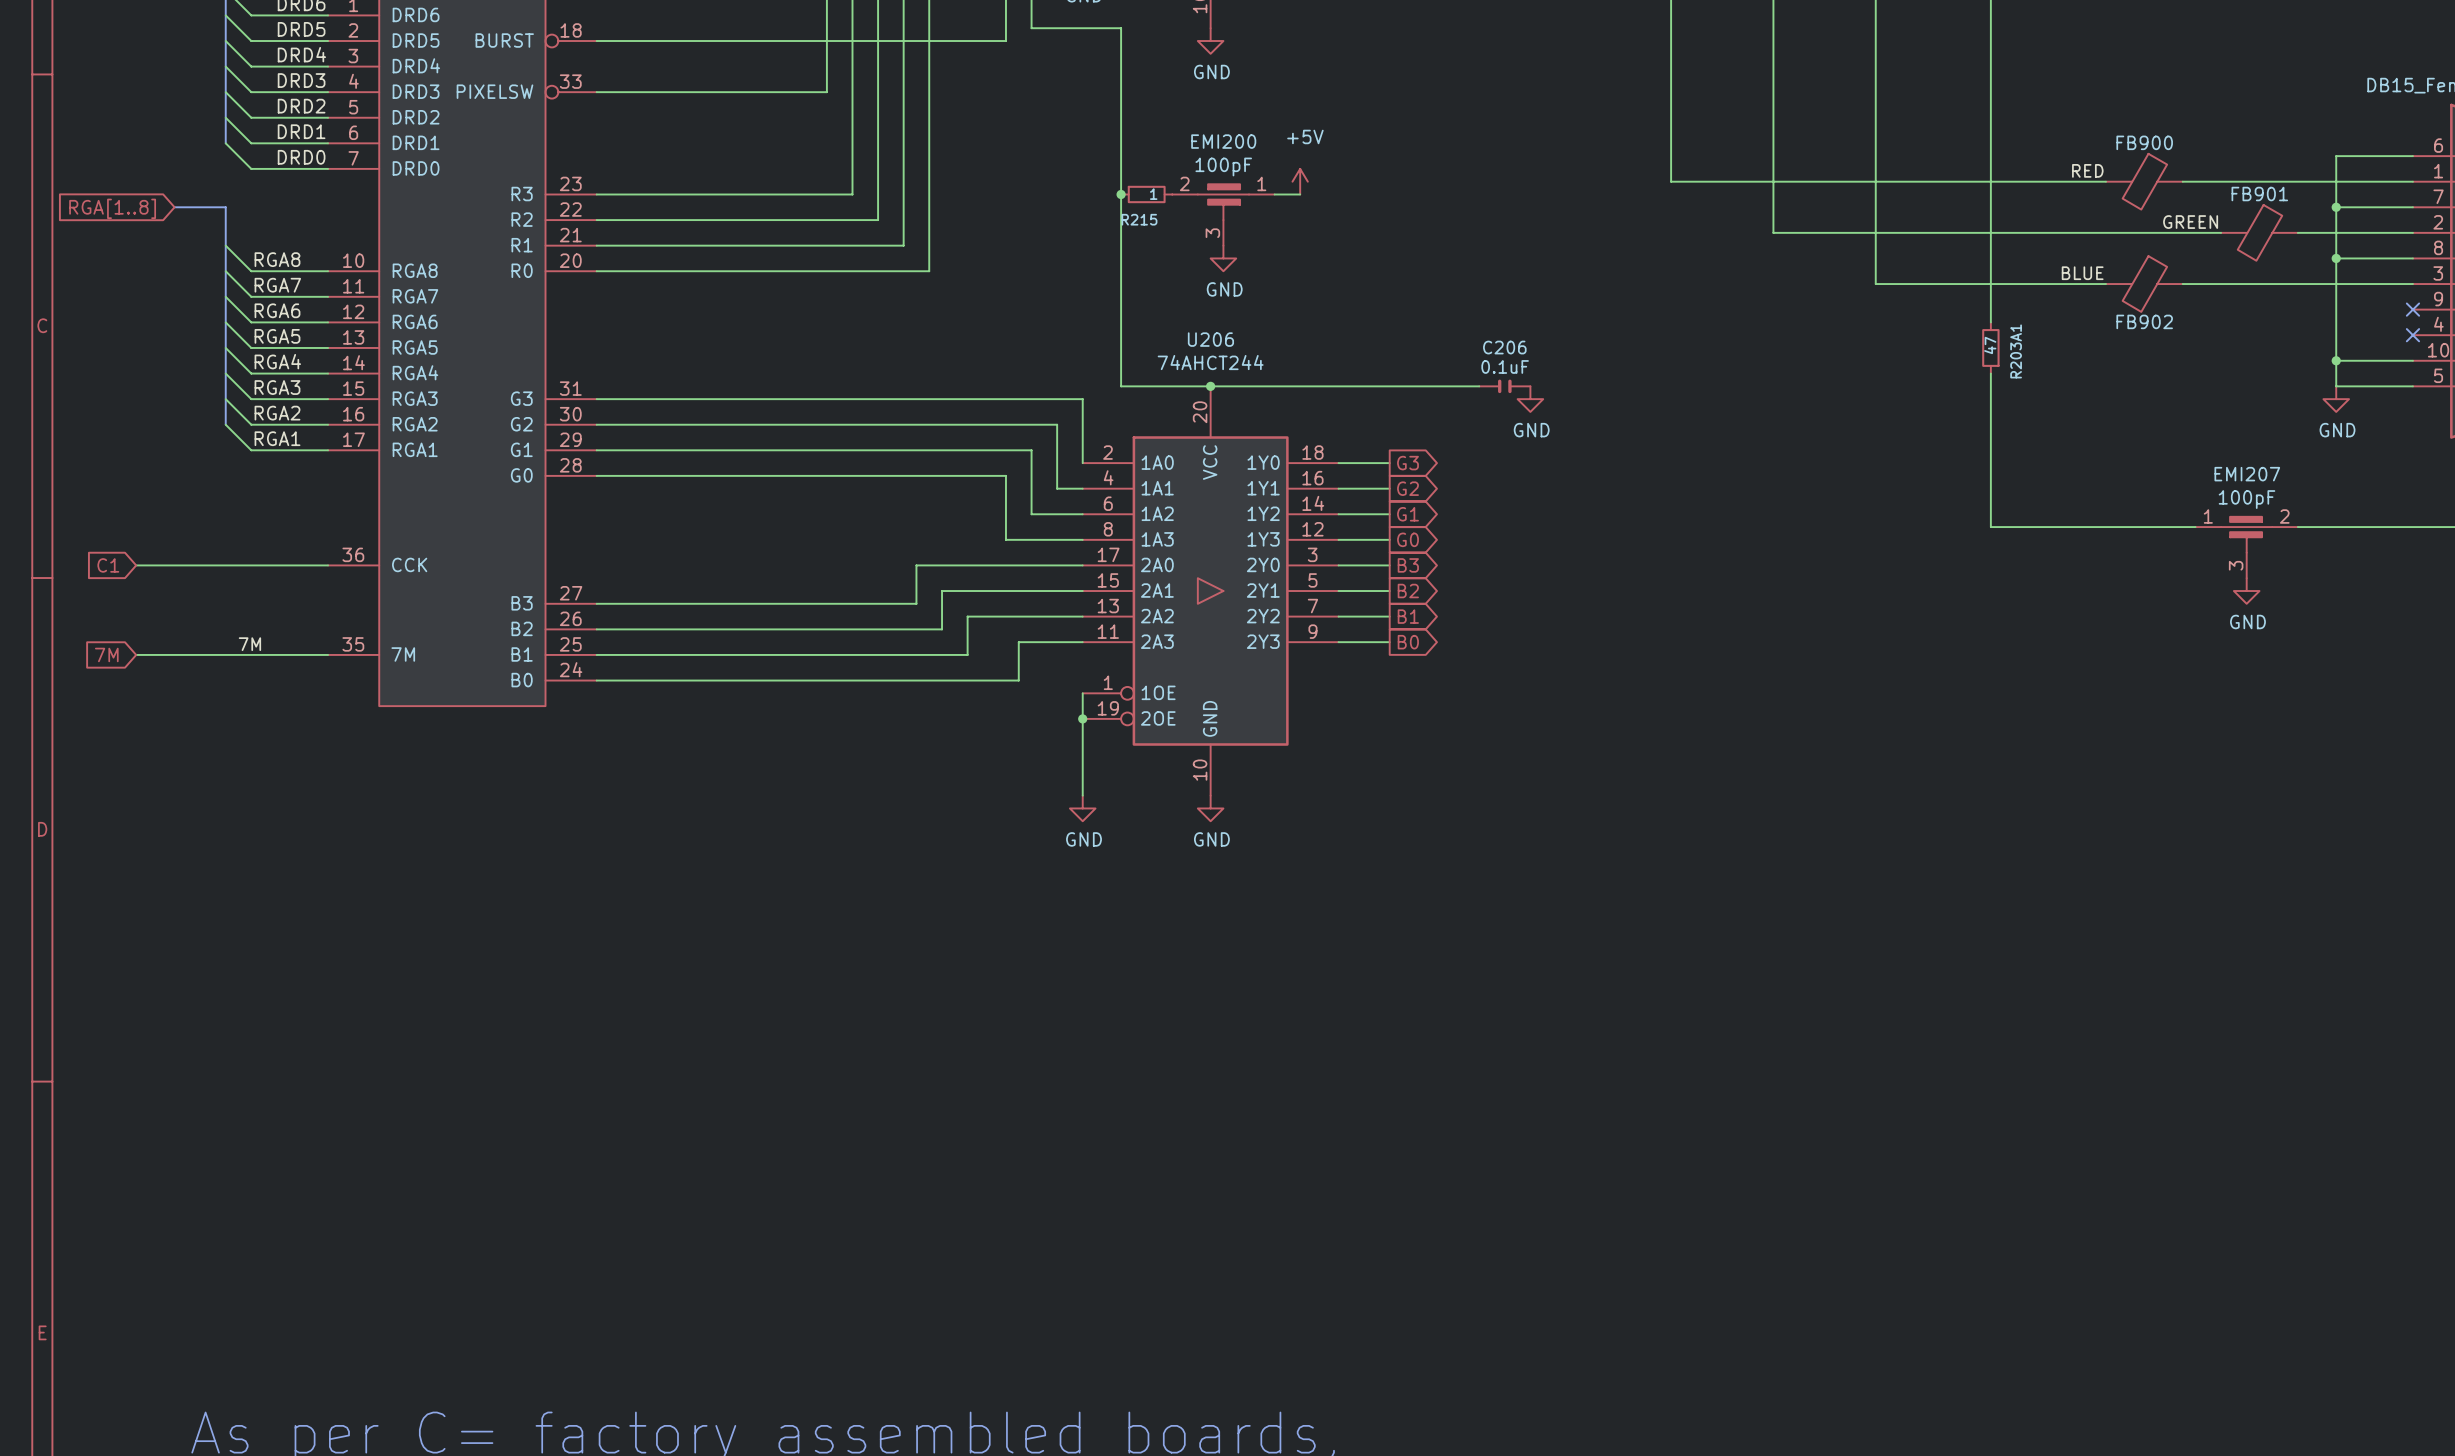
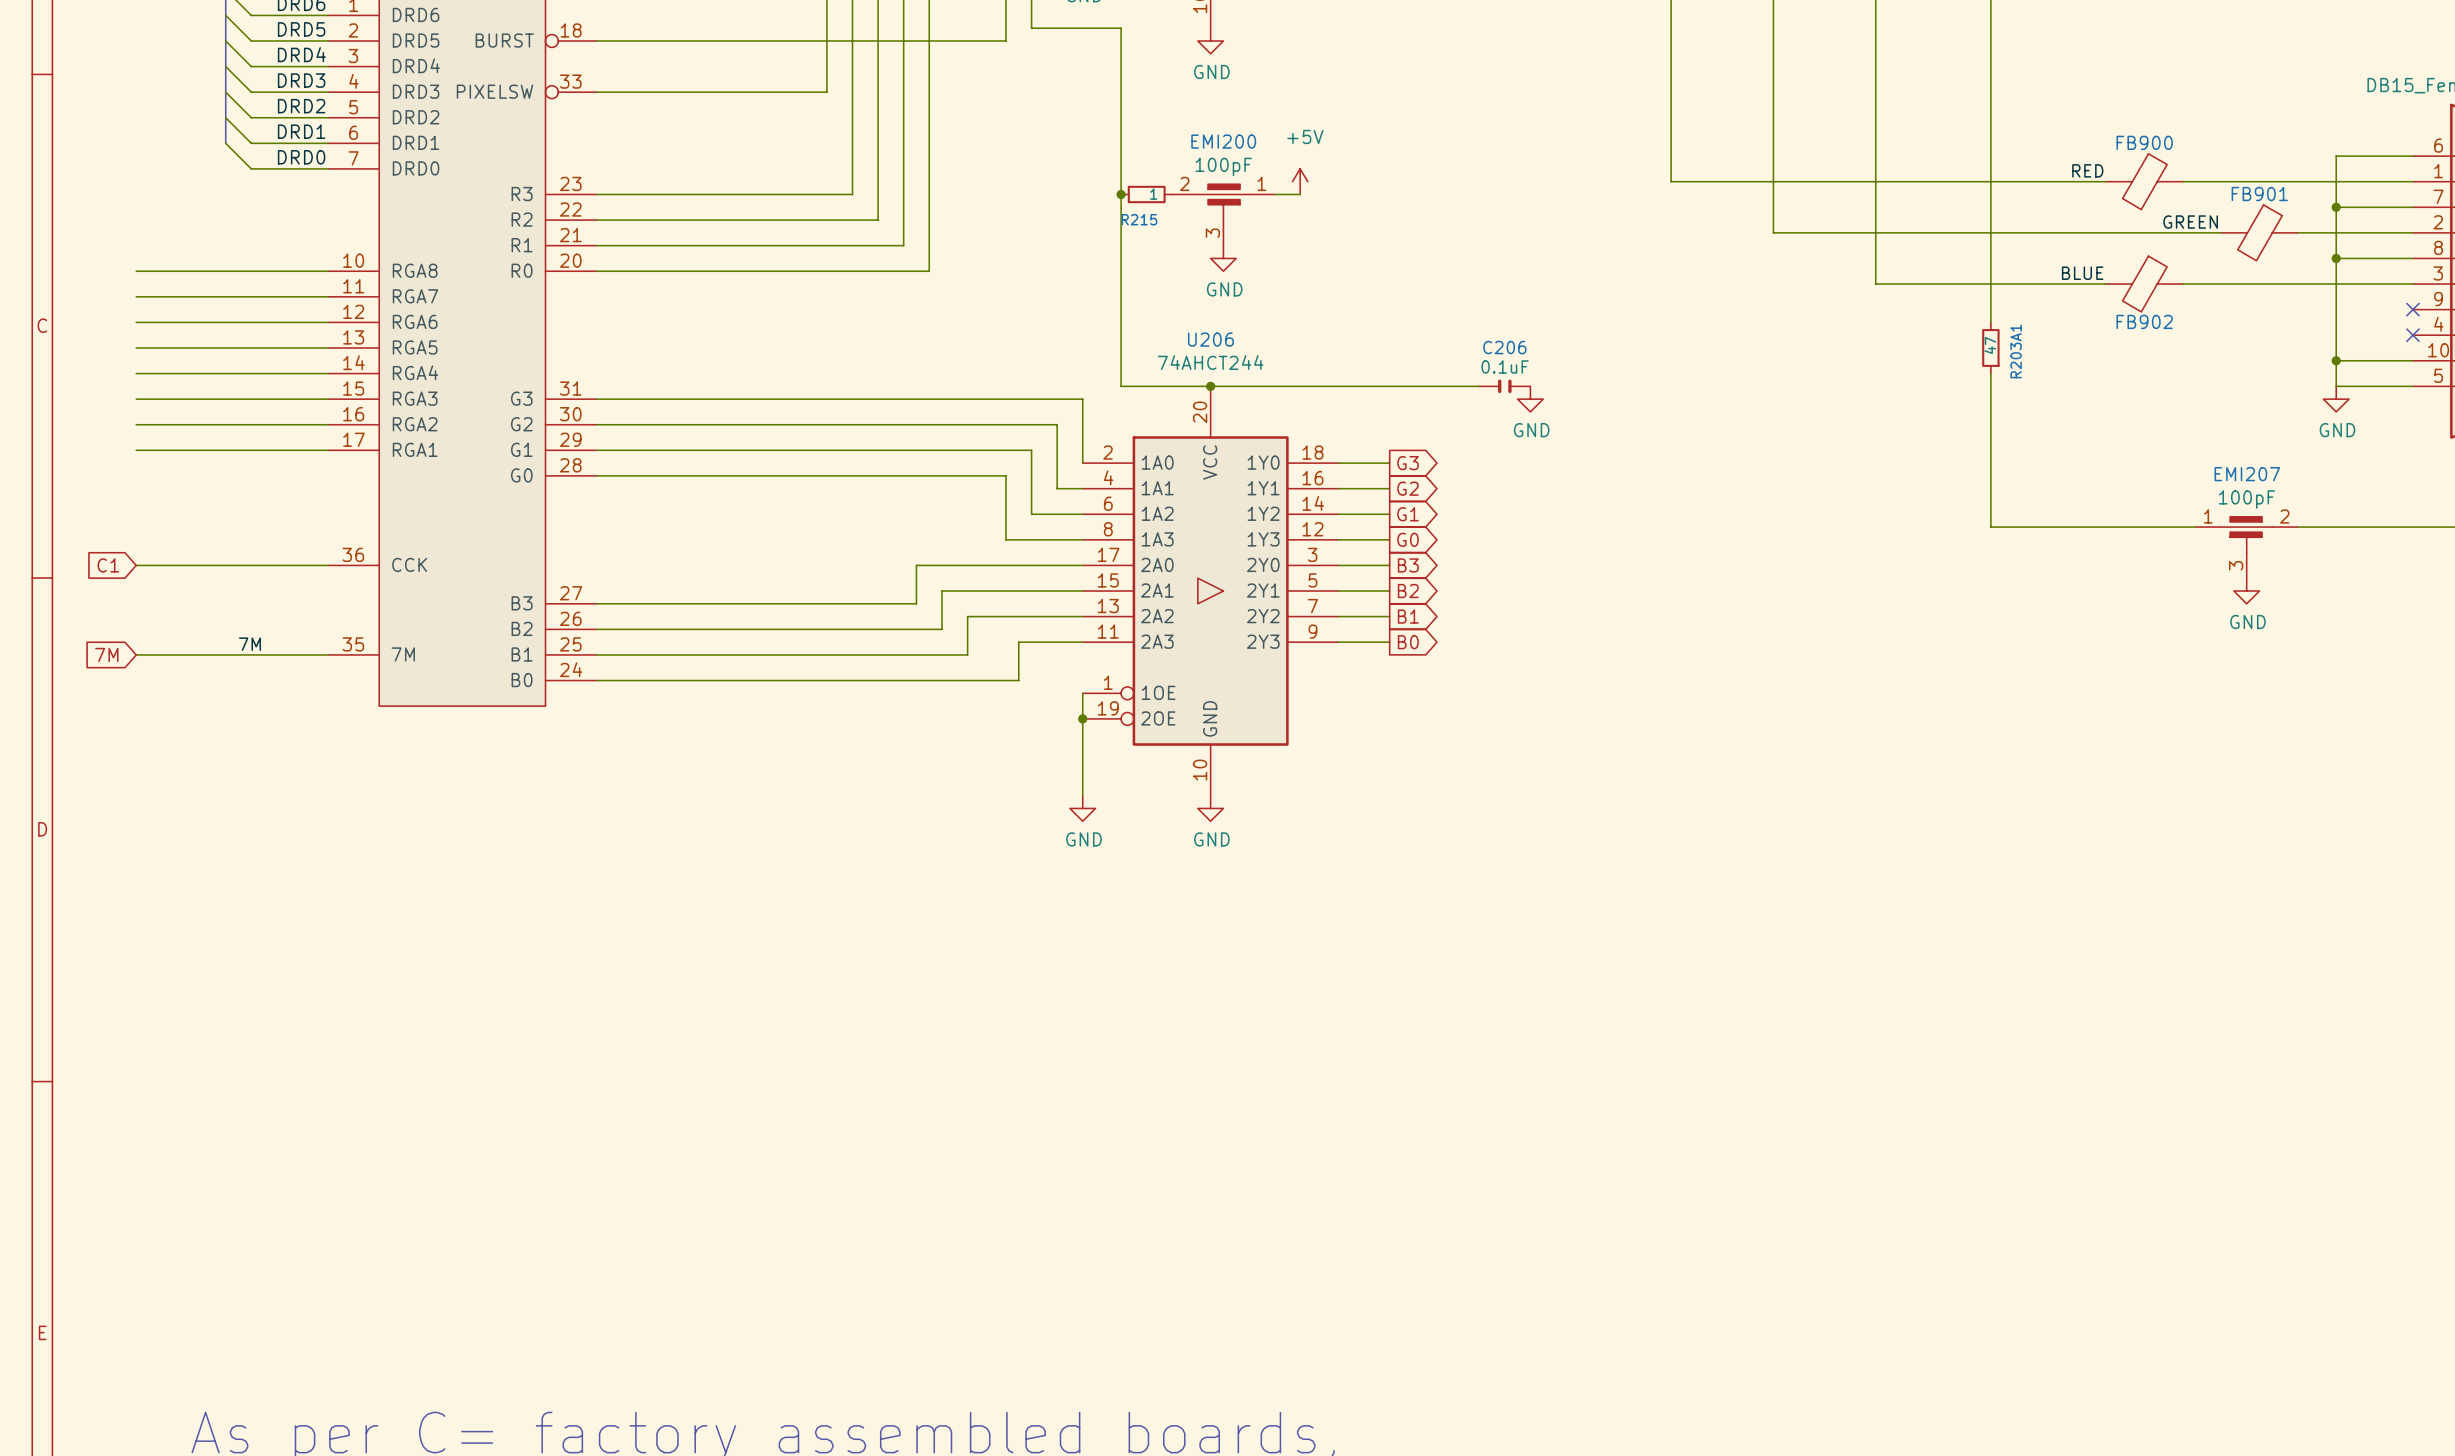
bus: (174, 207) (225, 207) (225, 424) -> none
global label: RGA[1..8] (112, 208) -> none
wire: (225, 245) (251, 271) -> (136, 271) (251, 271)
label: RGA8 (277, 259) -> none
wire: (225, 271) (251, 296) -> (136, 296) (251, 296)
label: RGA7 (277, 285) -> none
wire: (225, 296) (251, 322) -> (136, 322) (251, 322)
label: RGA6 (277, 310) -> none
wire: (225, 322) (251, 347) -> (136, 347) (251, 347)
label: RGA5 (277, 336) -> none
wire: (225, 347) (251, 373) -> (136, 373) (251, 373)
label: RGA4 (277, 361) -> none
wire: (225, 373) (251, 399) -> (136, 399) (251, 399)
label: RGA3 (277, 387) -> none
wire: (225, 399) (251, 424) -> (136, 424) (251, 424)
label: RGA2 (277, 413) -> none
wire: (225, 424) (251, 450) -> (136, 450) (251, 450)
label: RGA1 (277, 438) -> none

